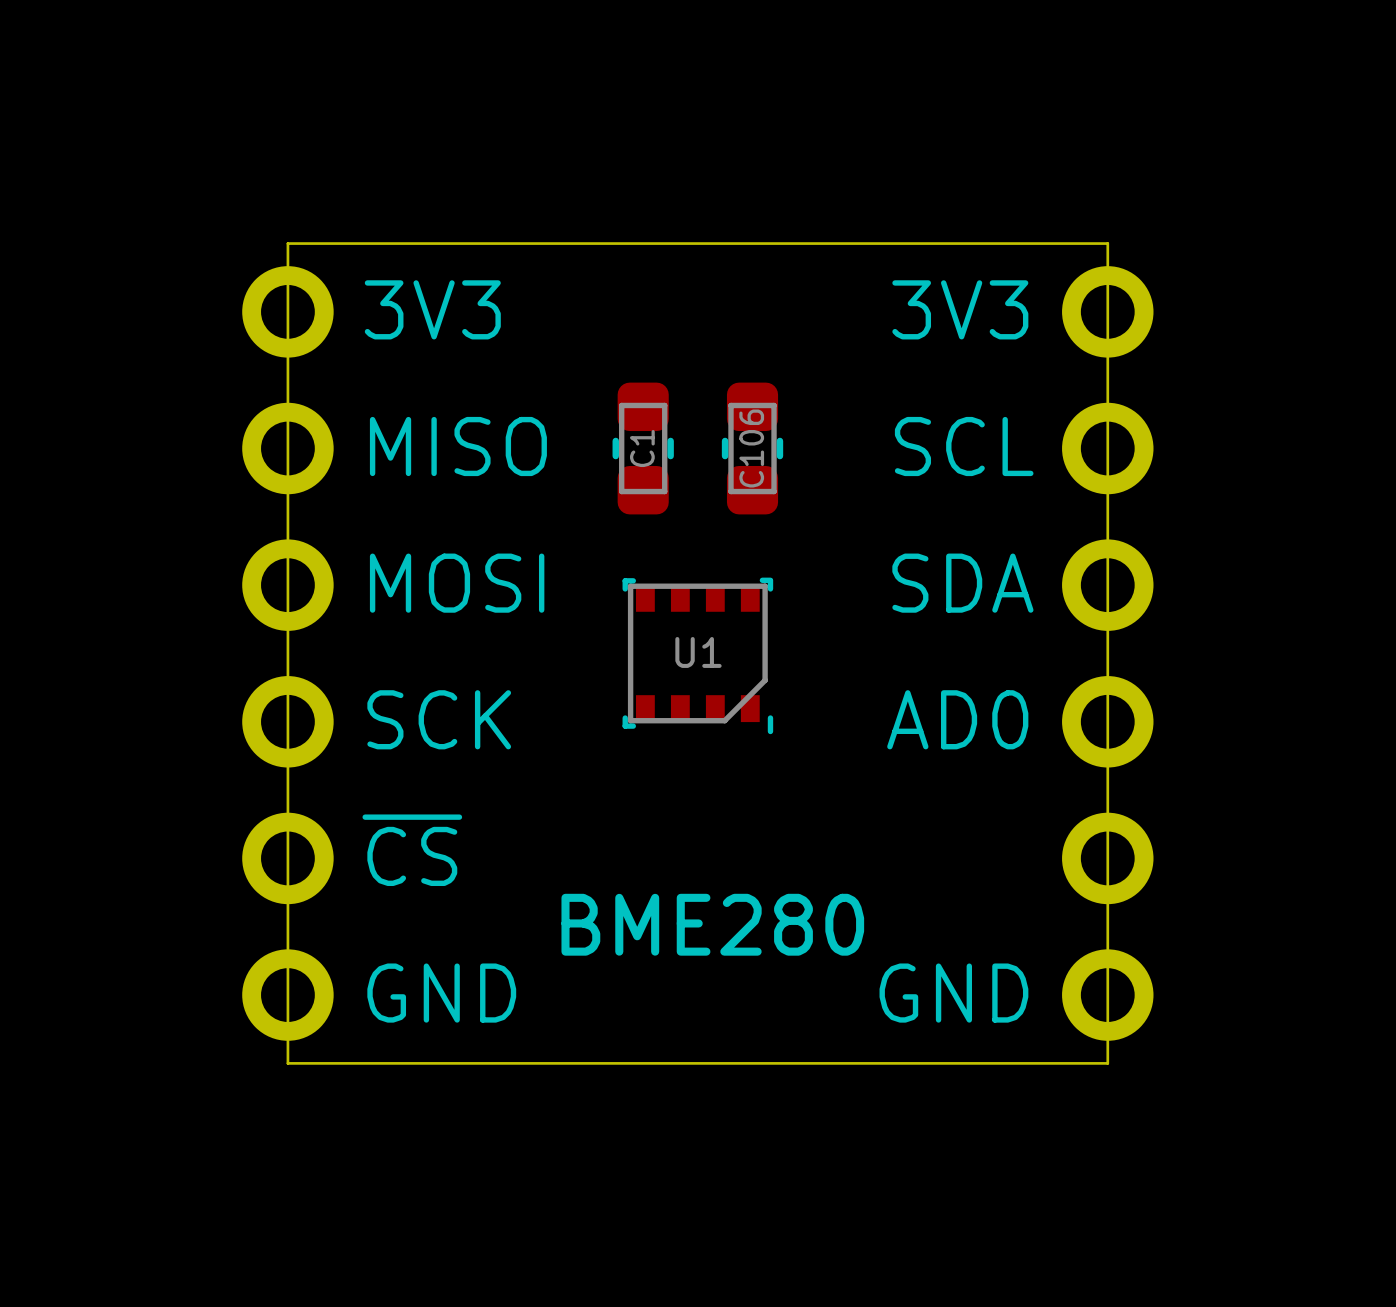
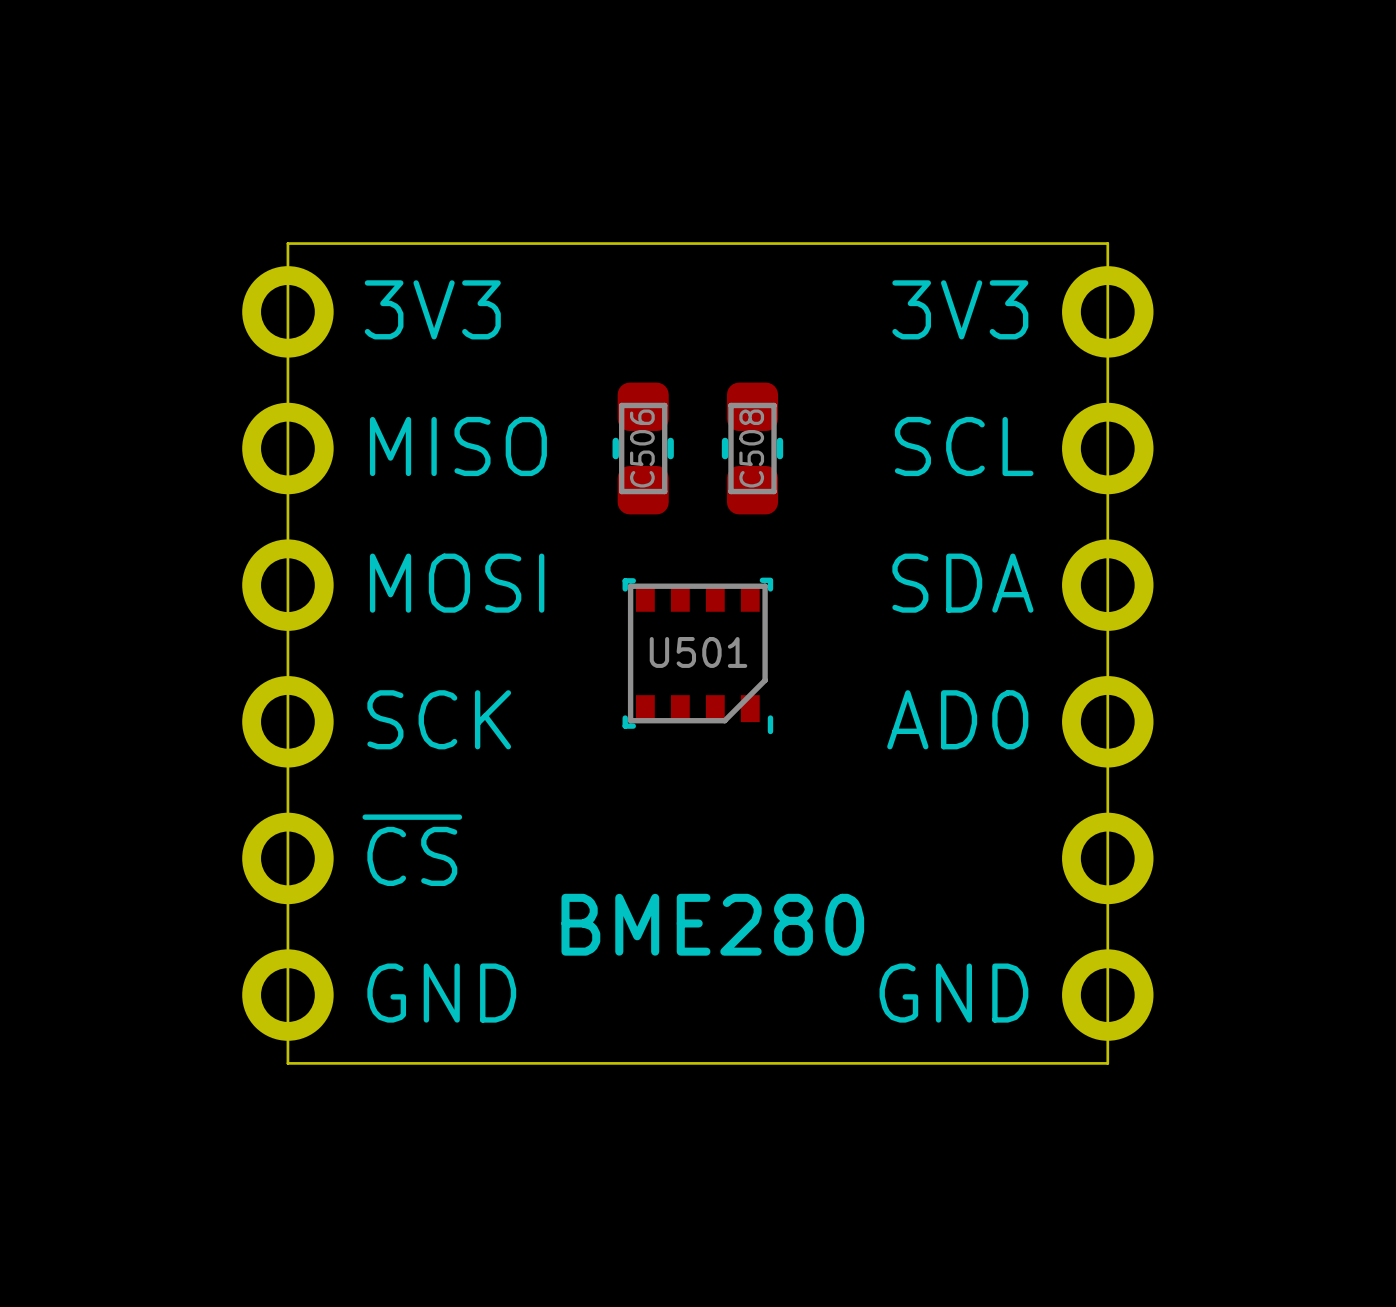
C1 name: C1 (642, 448) -> C506 (642, 448)
C106 name: C106 (751, 448) -> C508 (751, 448)
U1 name: U1 (698, 652) -> U501 (698, 652)

